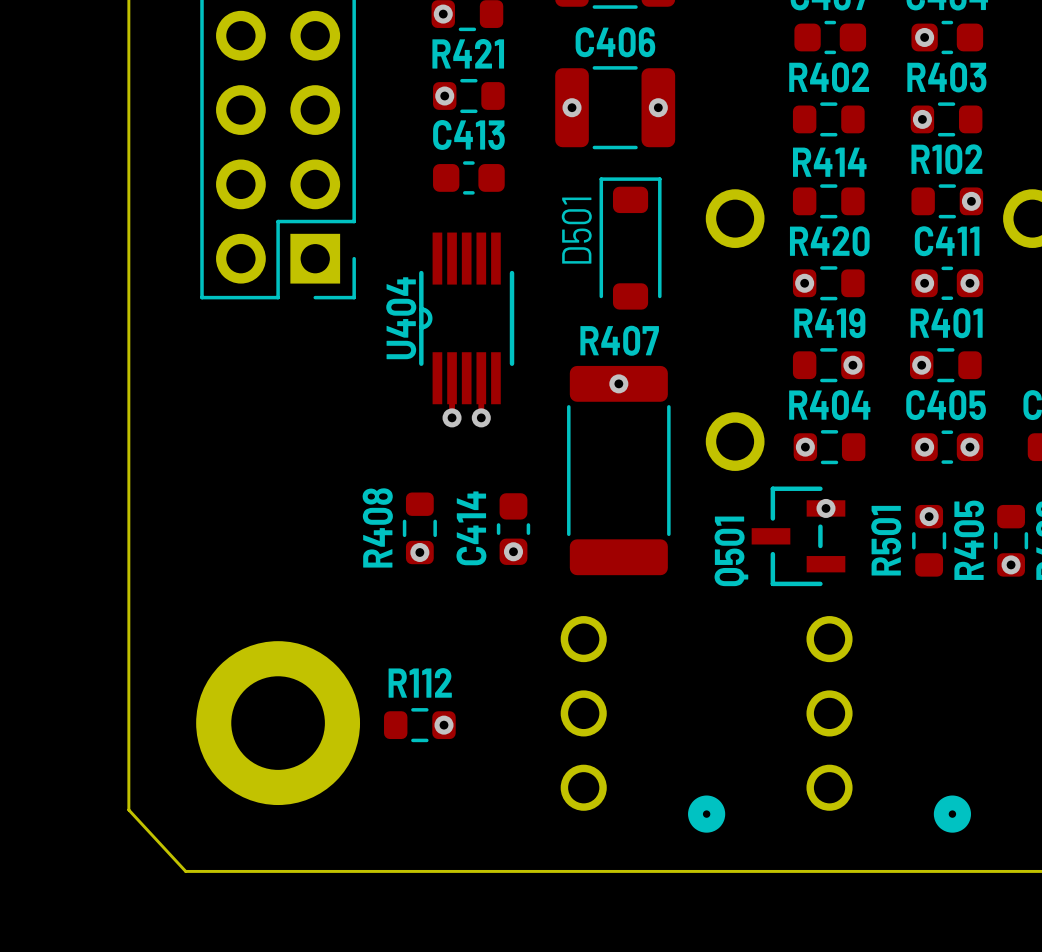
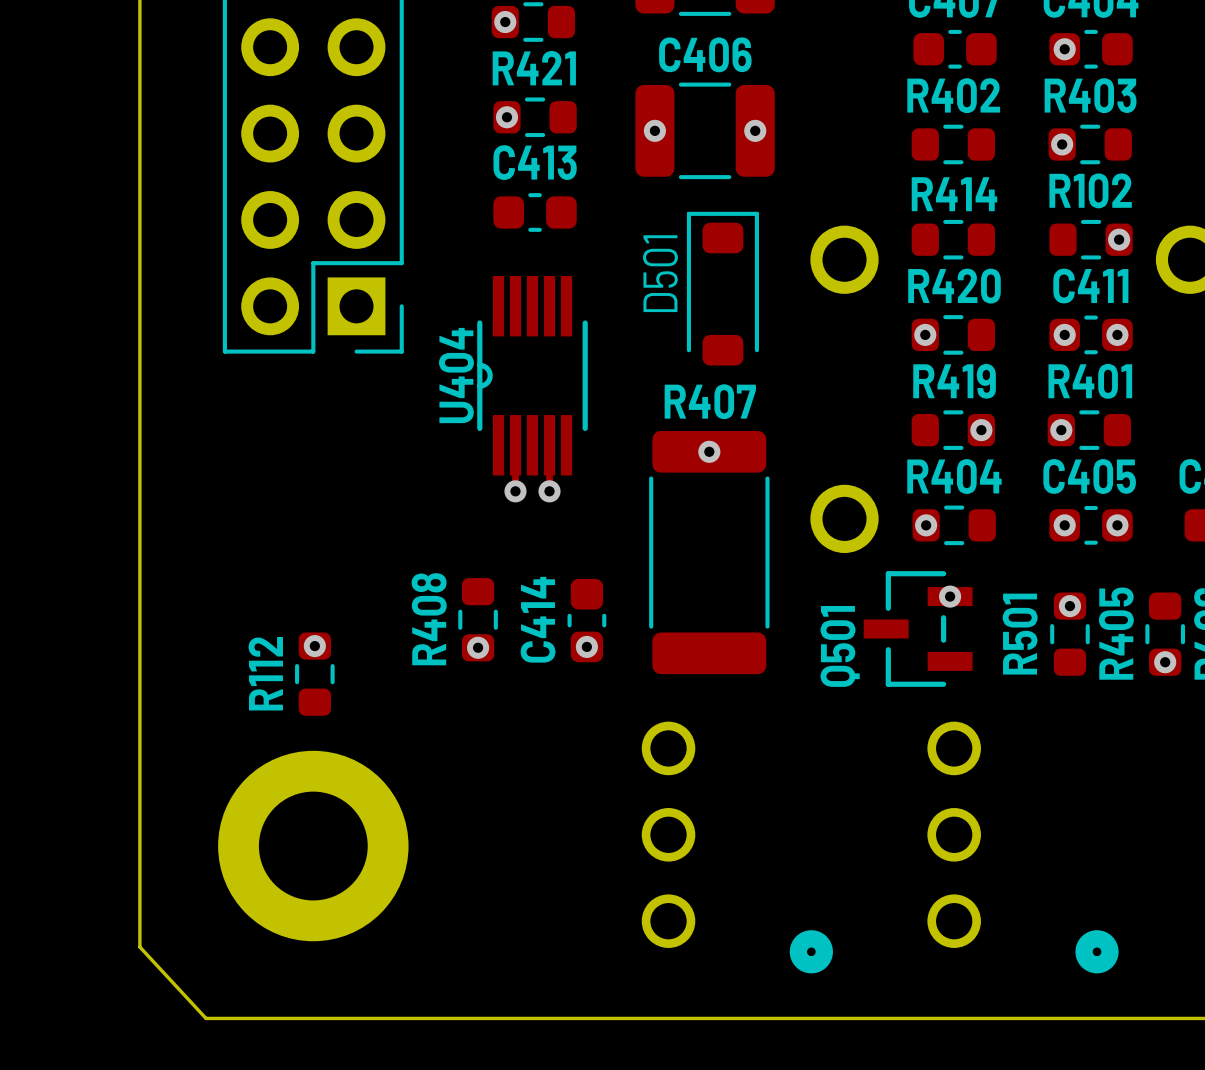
via: none -> (314, 646)
R112 rotation: 0° (419, 725) -> 90° clockwise (314, 674)
R112 position: (419, 725) -> (314, 674)
via: (444, 725) -> none

